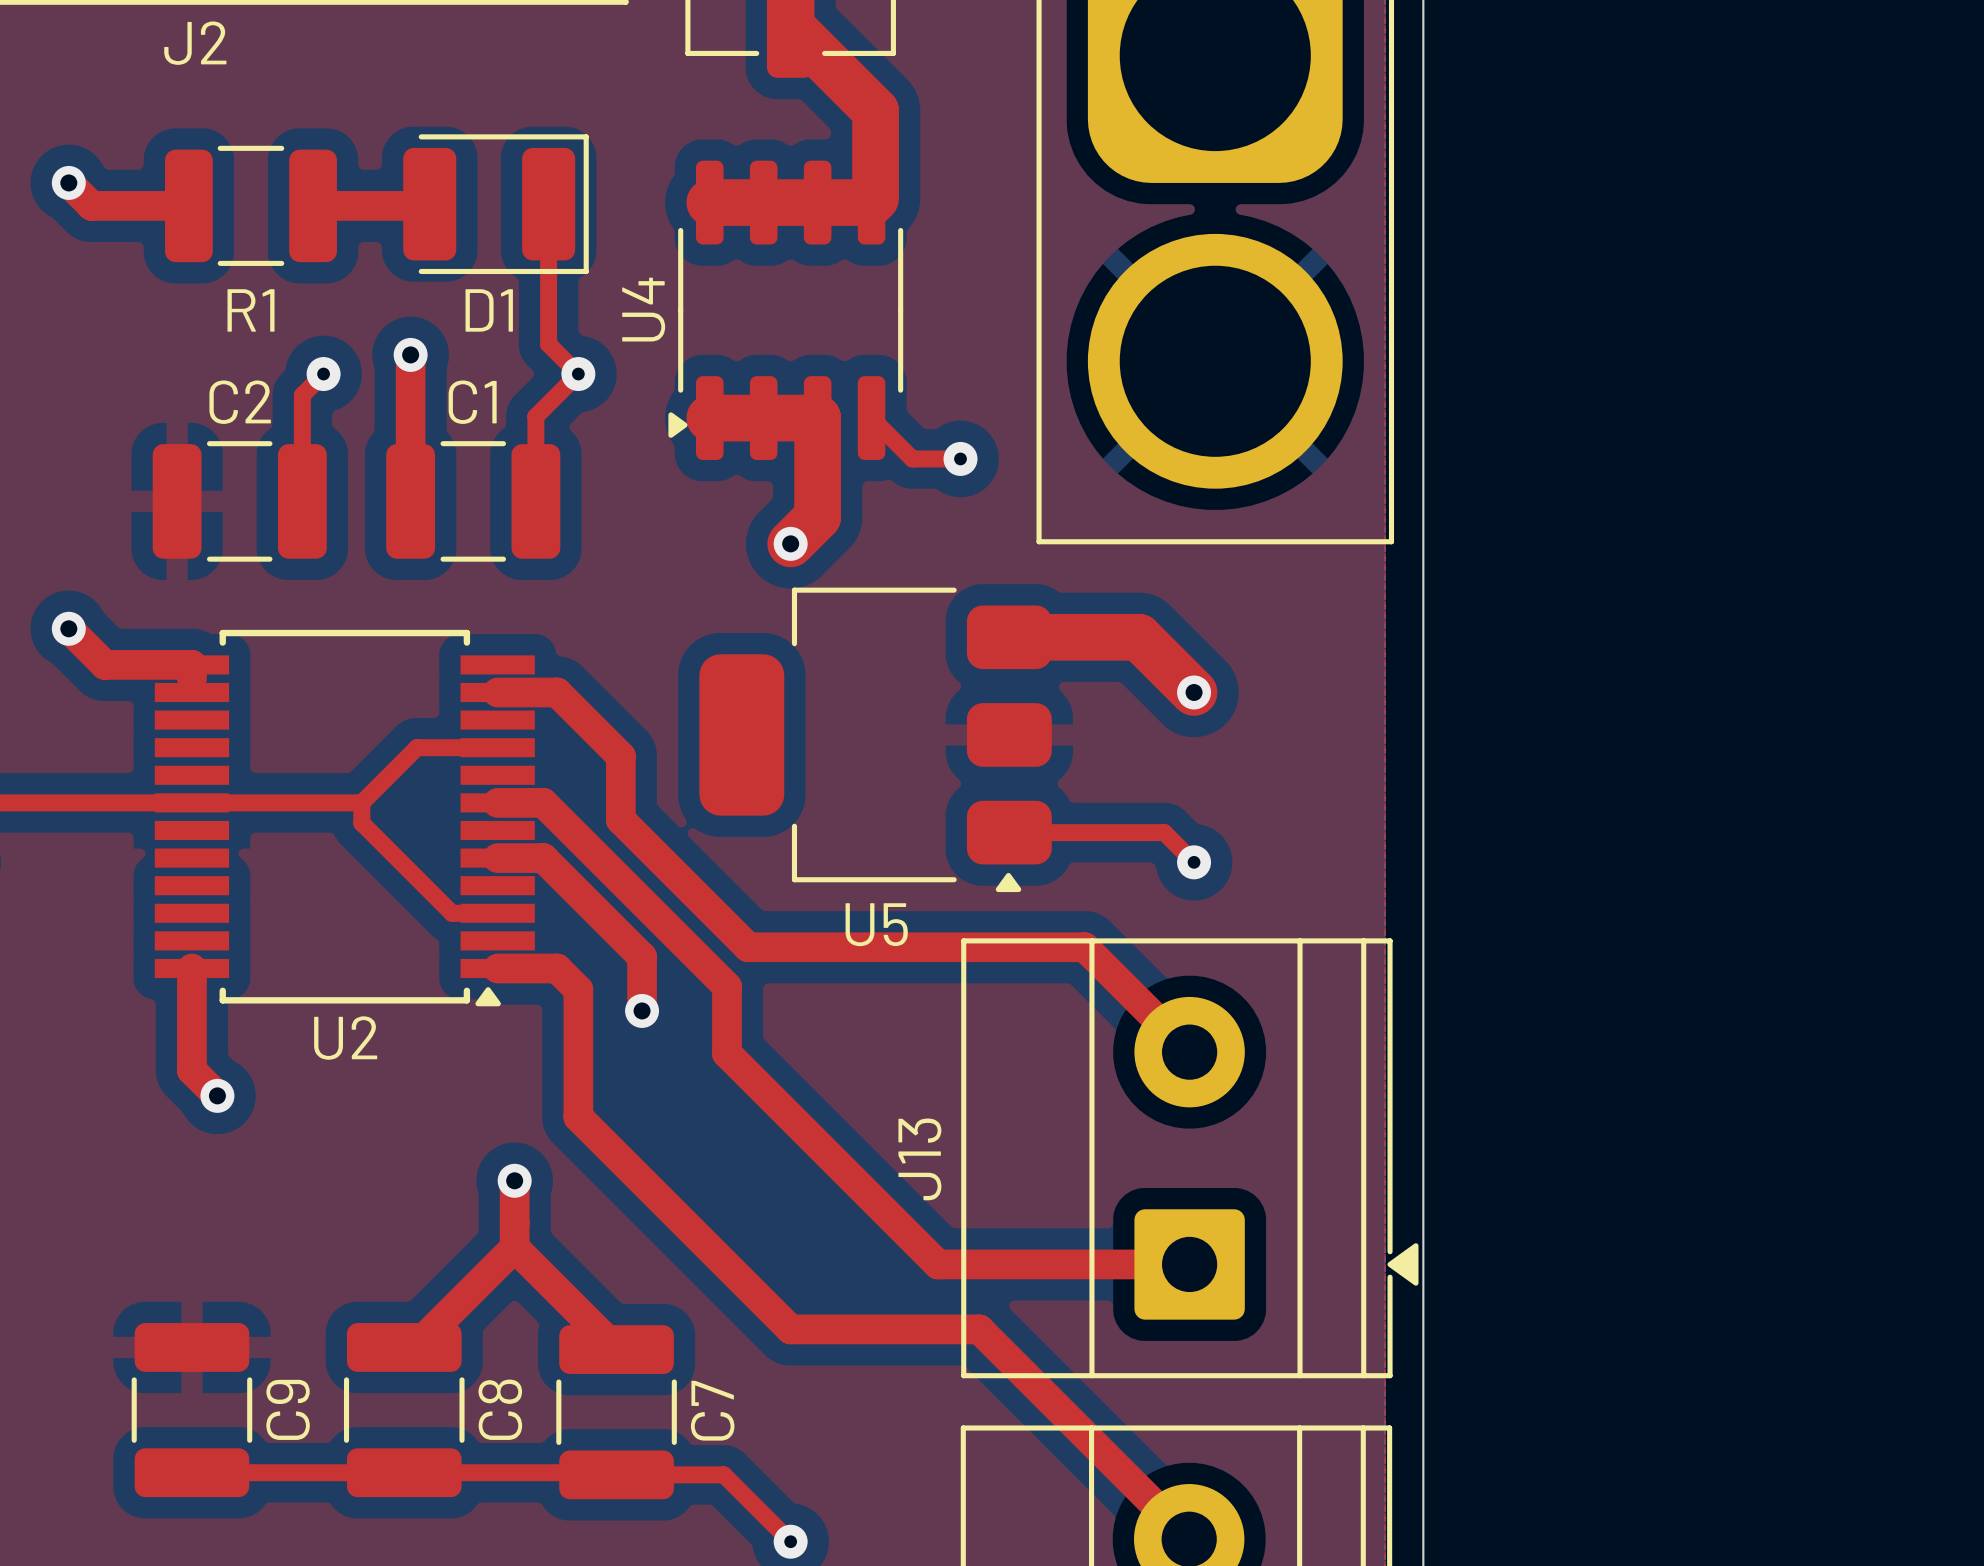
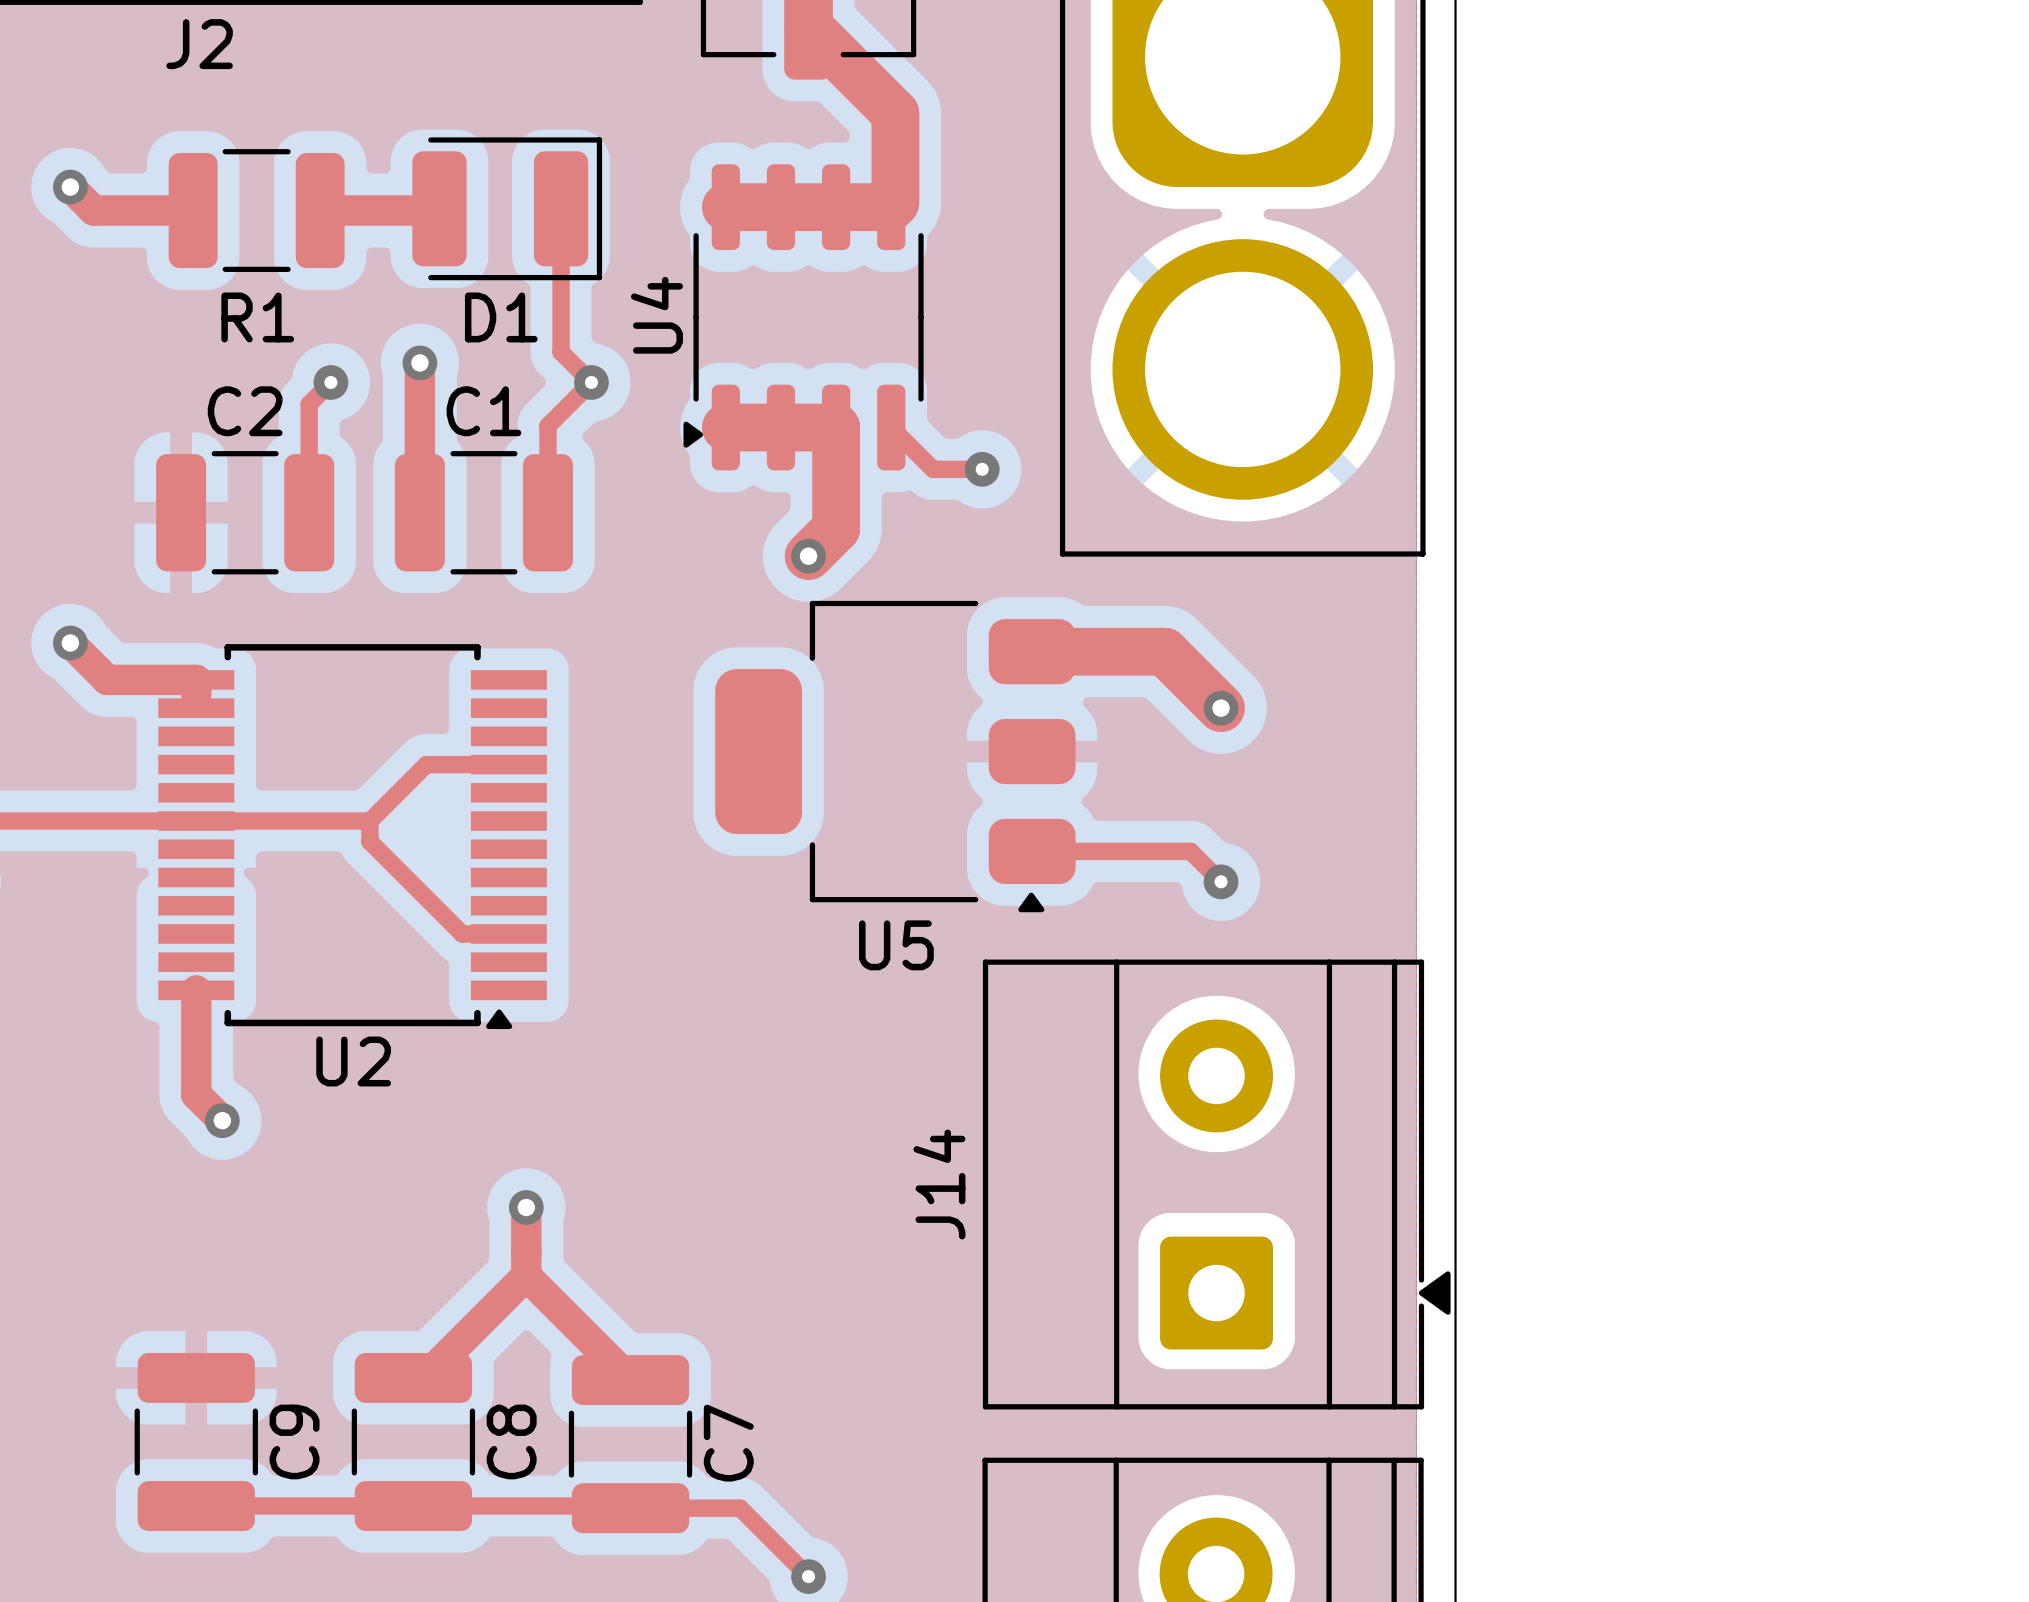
top track: (497, 692) (557, 692) (620, 756) (620, 819) (748, 947) (1084, 947) (1189, 1052) -> none
top track: (497, 802) (543, 802) (726, 986) (726, 1053) (938, 1264) (1189, 1264) -> none
top track: (497, 858) (543, 858) (642, 956) (642, 1010) -> none
top track: (497, 968) (557, 968) (578, 989) (578, 1117) (790, 1329) (979, 1329) (1189, 1539) -> none
via: (642, 1010) -> none
J13 name: J13 (919, 1159) -> J14 (939, 1184)

